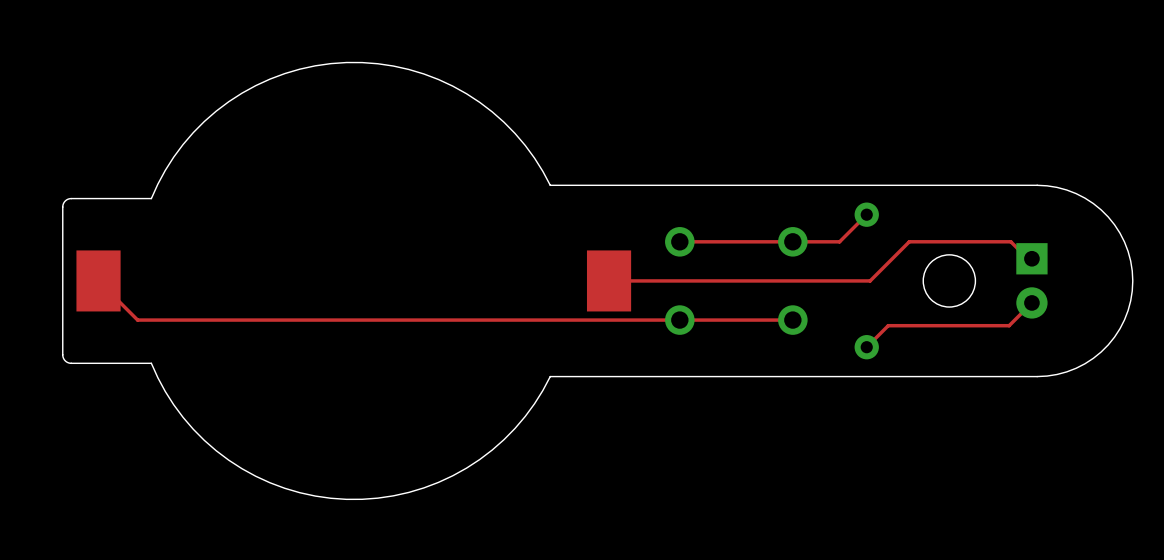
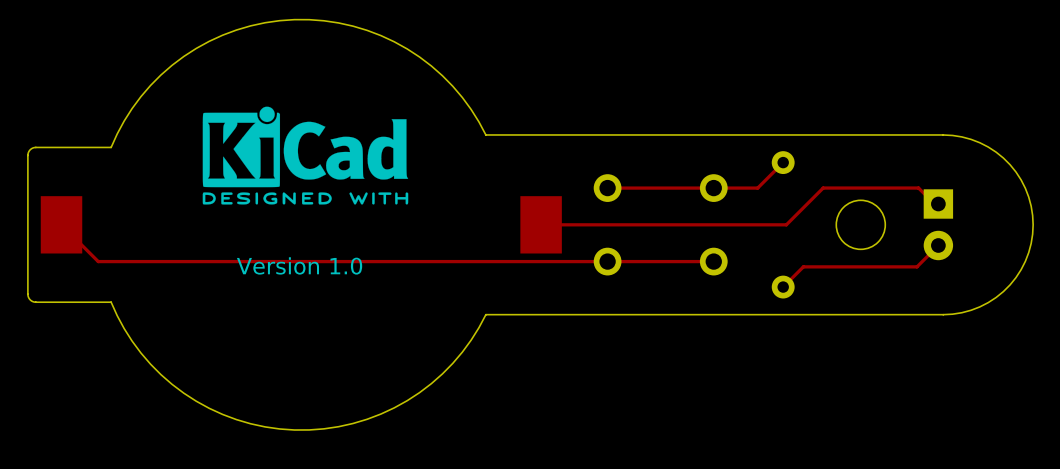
drawing: none -> [202, 106, 409, 205]
text: none -> Version 1.0 (299, 265)

